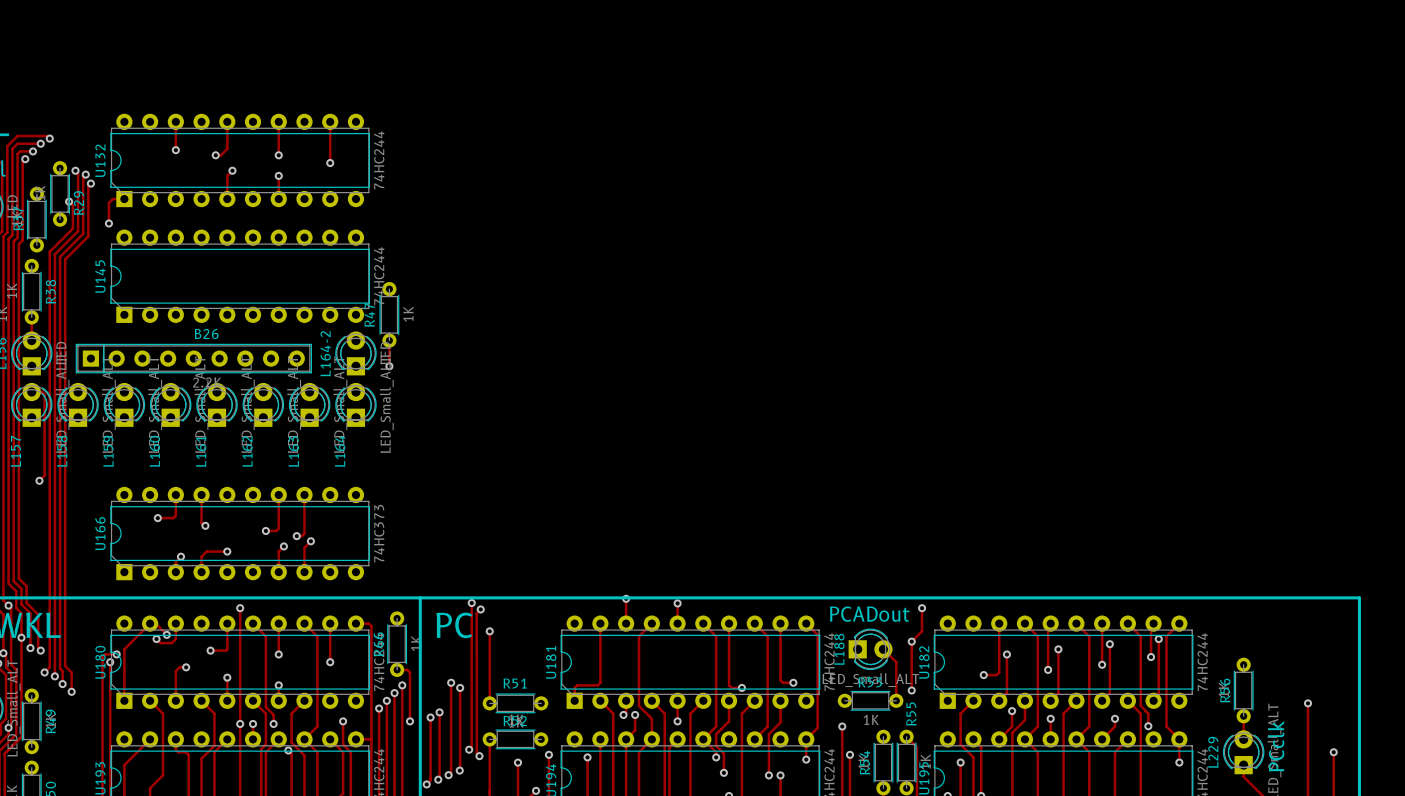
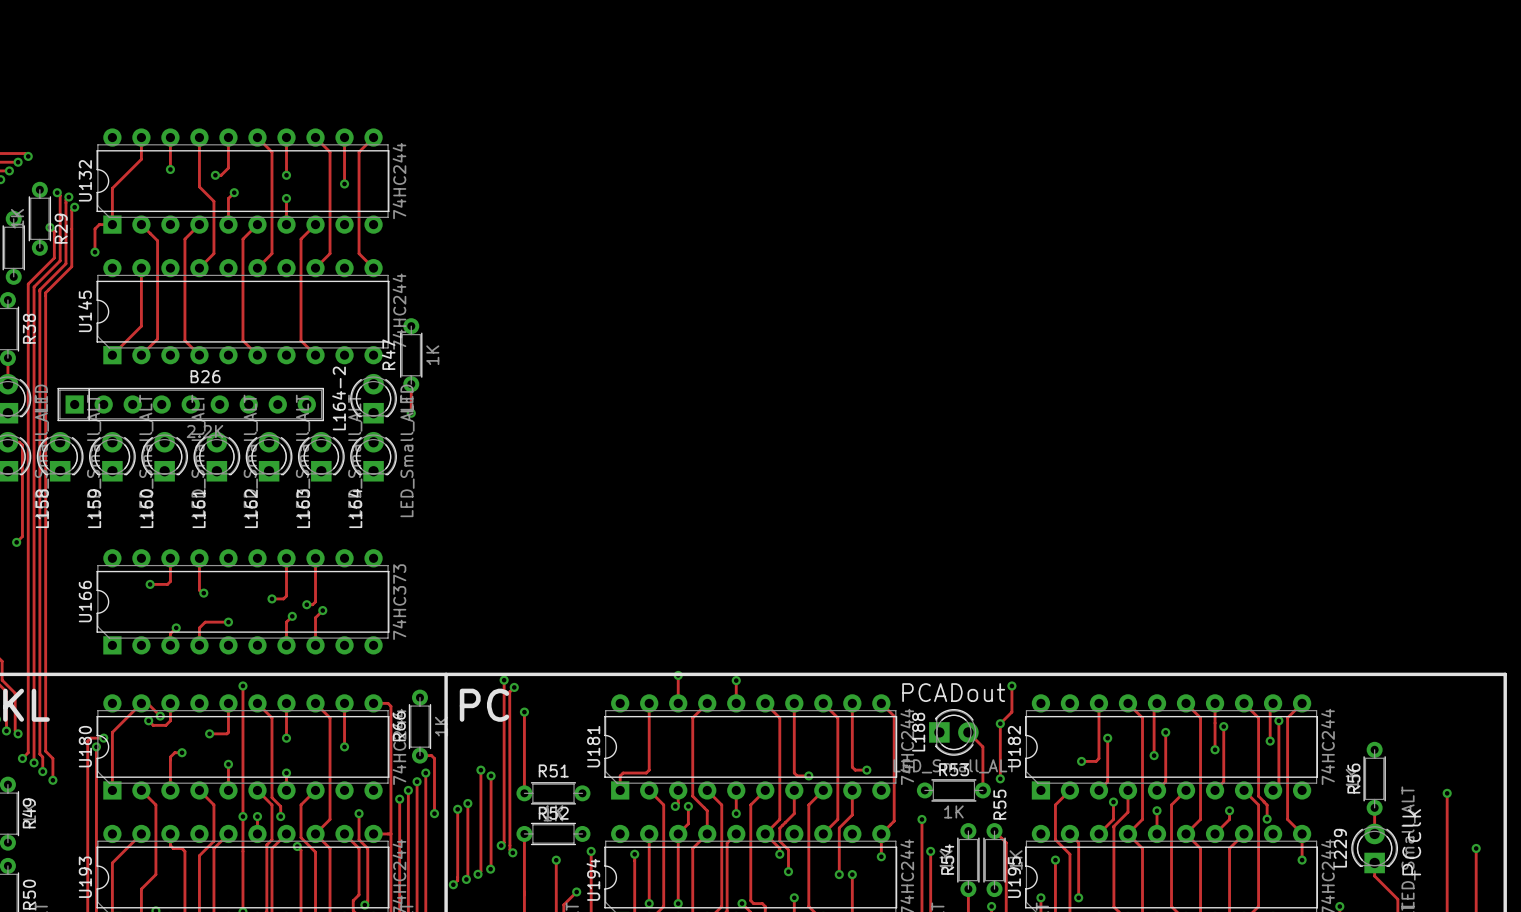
track: none -> (141, 137) (141, 159) (112, 188) (112, 224)
track: none -> (199, 137) (199, 186) (213, 201) (213, 253) (199, 268)
track: none -> (257, 137) (271, 152) (271, 253) (257, 268)
track: none -> (315, 137) (330, 152) (330, 253) (315, 268)
track: none -> (373, 137) (359, 152) (359, 253) (373, 268)
track: none -> (141, 224) (157, 240) (157, 339) (141, 355)
track: none -> (199, 224) (184, 239) (184, 340) (199, 355)
track: none -> (257, 224) (242, 239) (242, 340) (257, 355)
track: none -> (315, 224) (301, 239) (301, 340) (315, 355)
track: none -> (141, 268) (141, 326) (112, 355)

